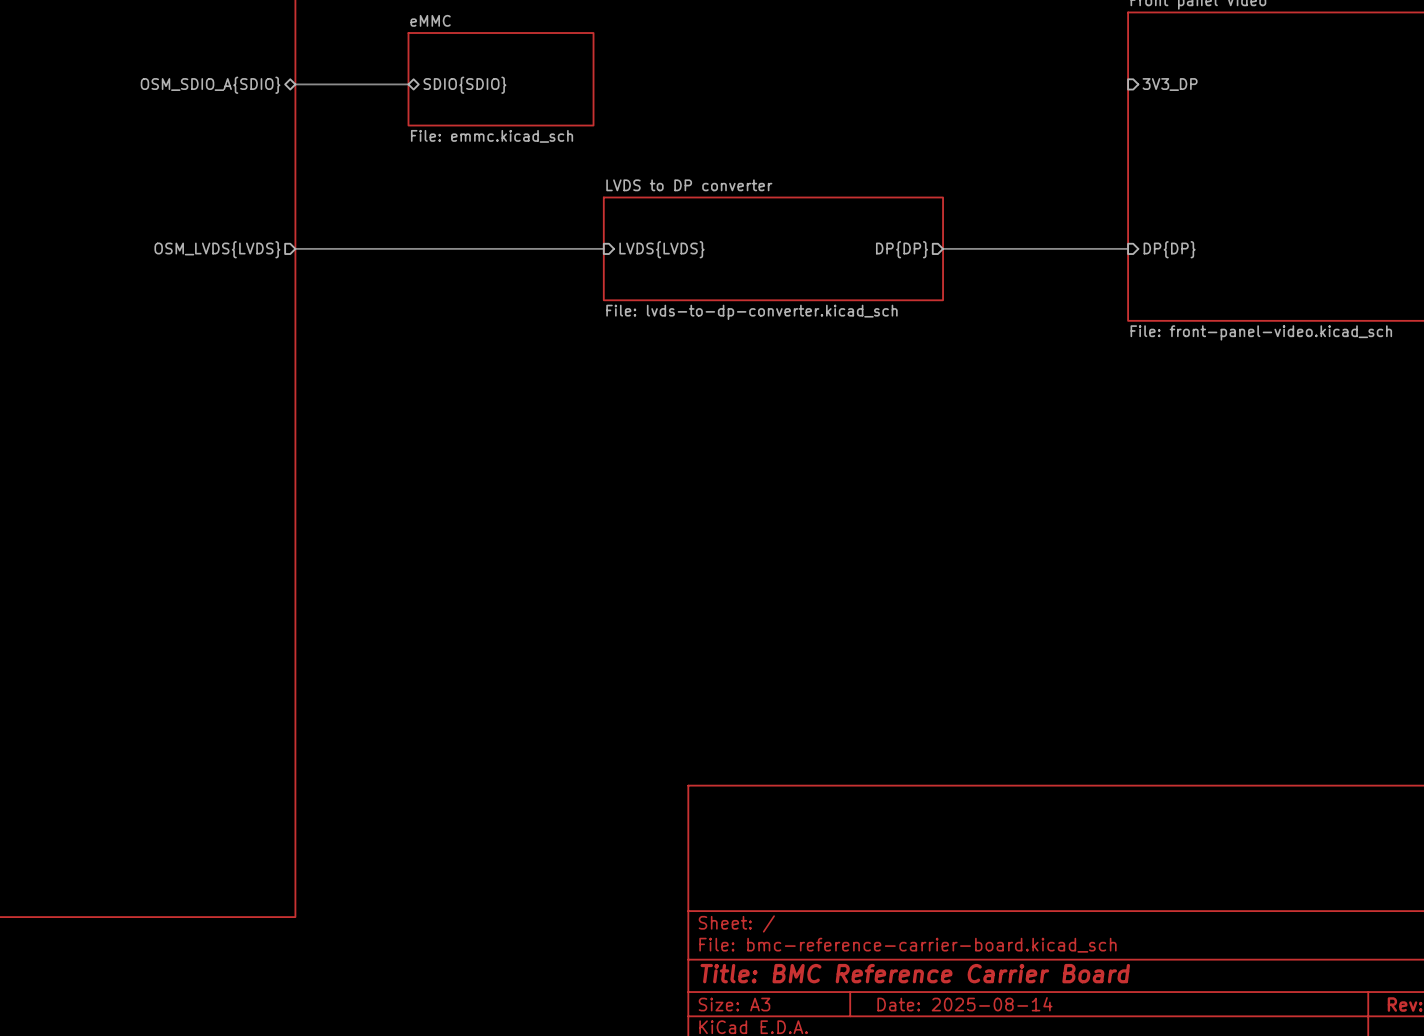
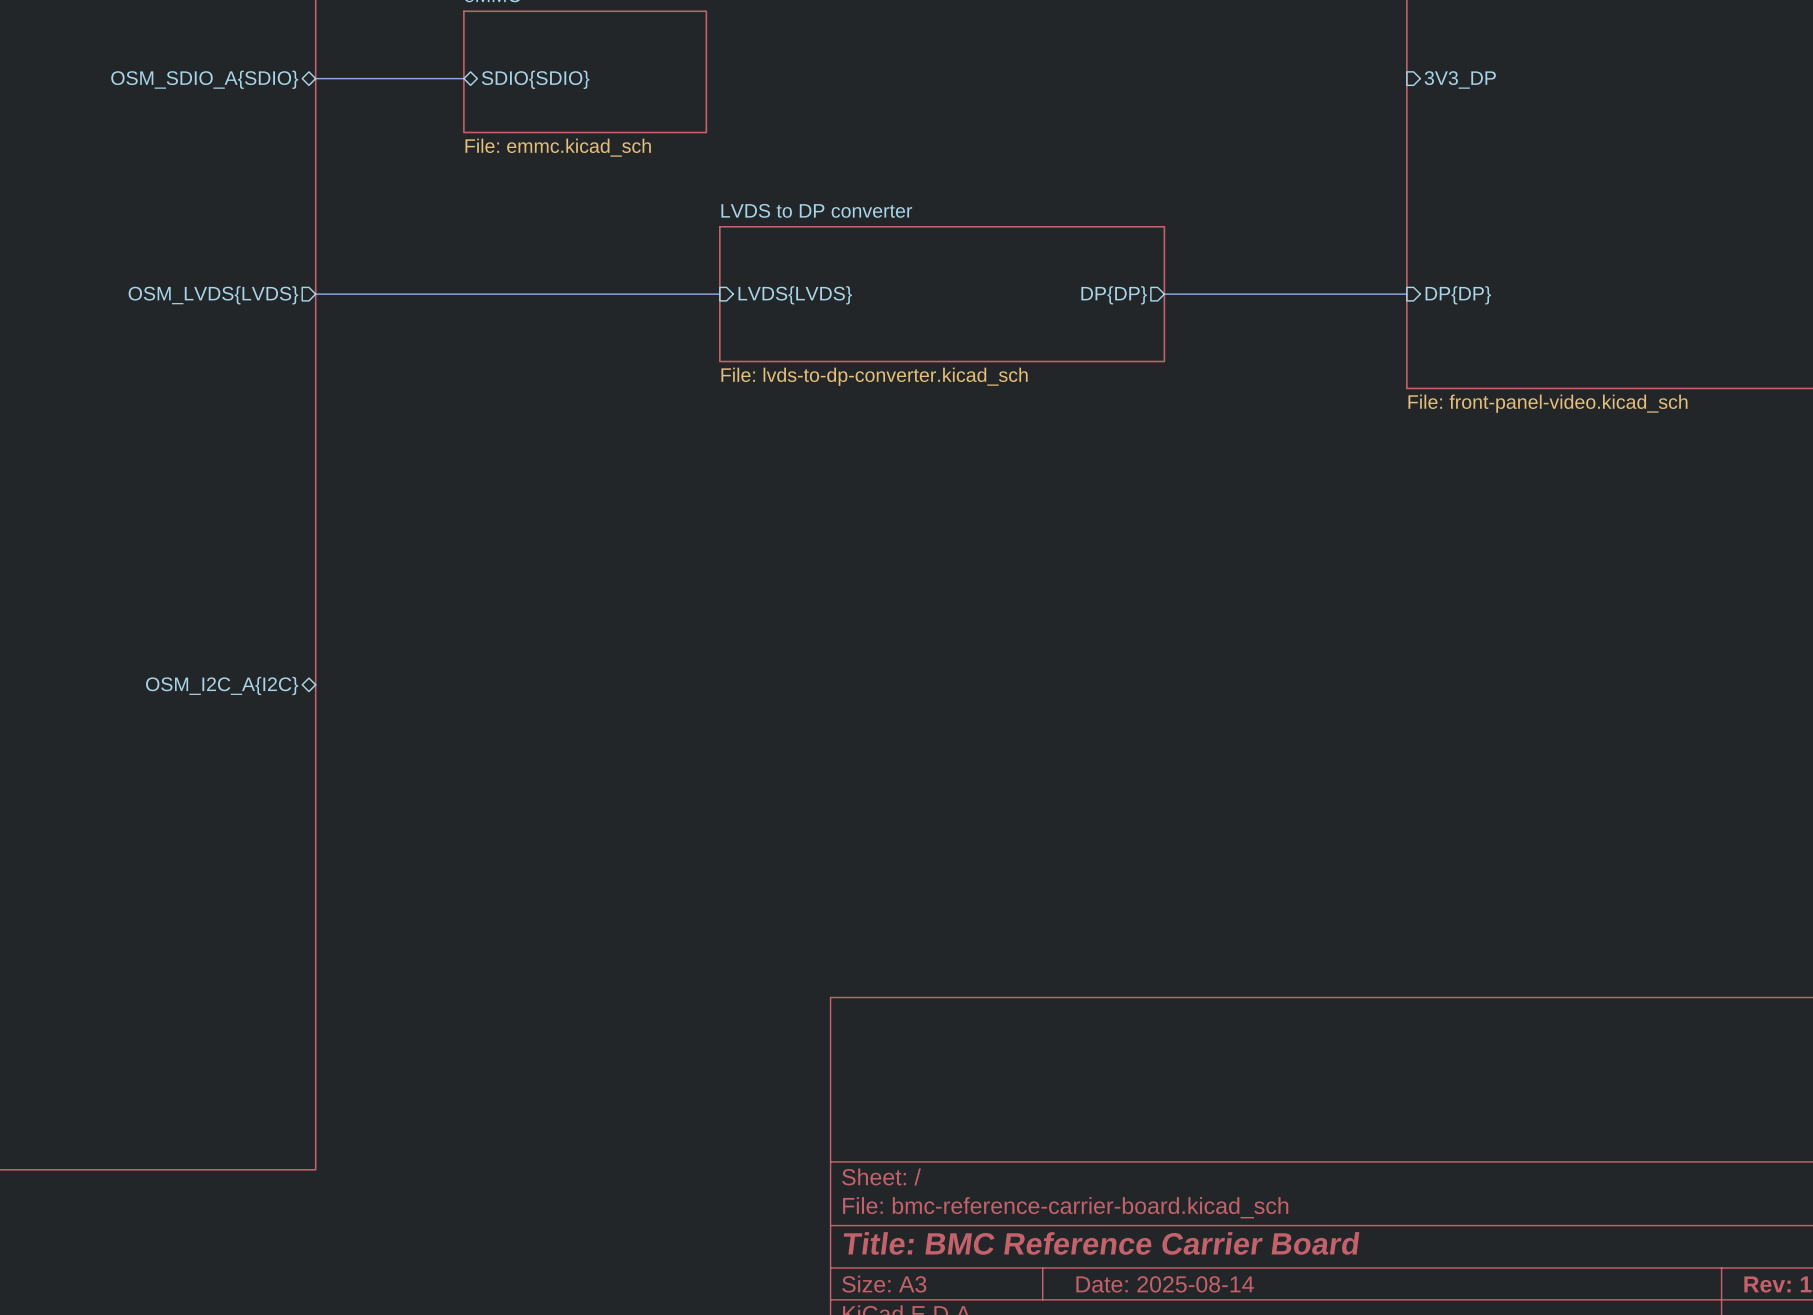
sheet pin: none -> OSM_I2C_A{I2C} (222, 685)

